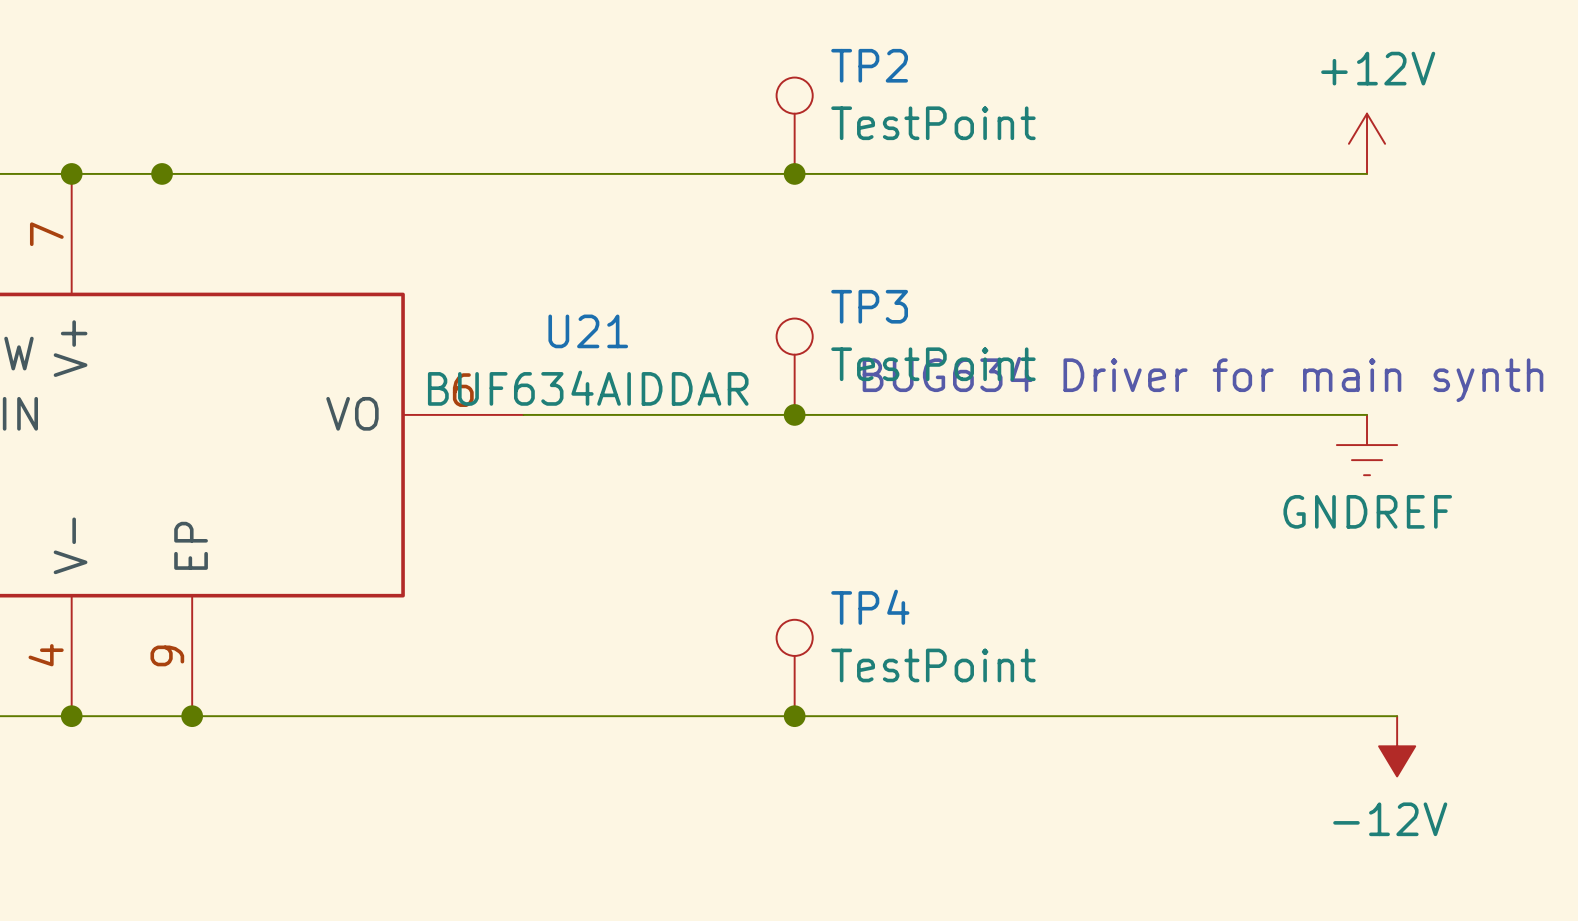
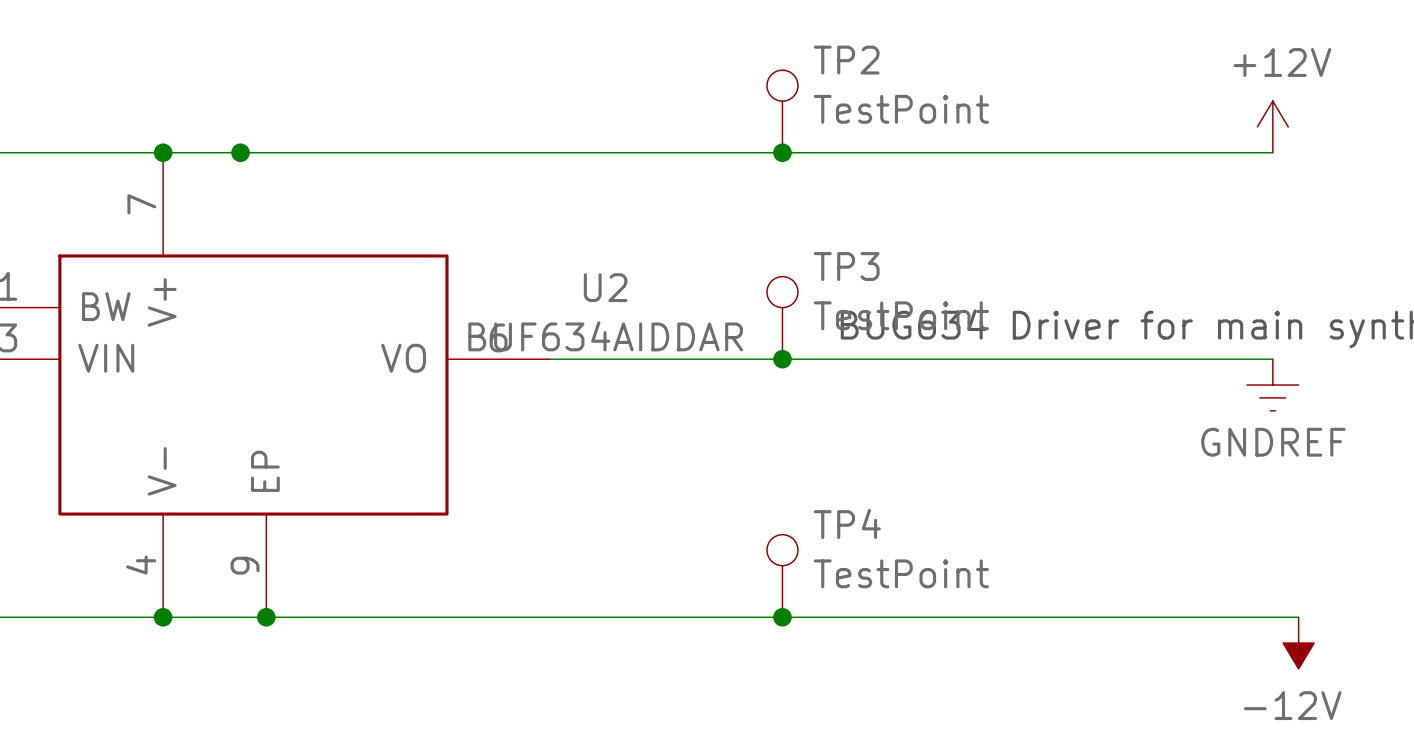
U21 name: U21 (588, 331) -> U2 (605, 287)

